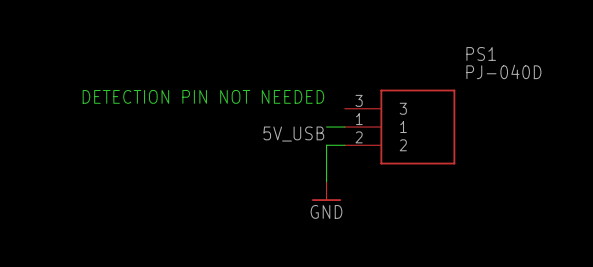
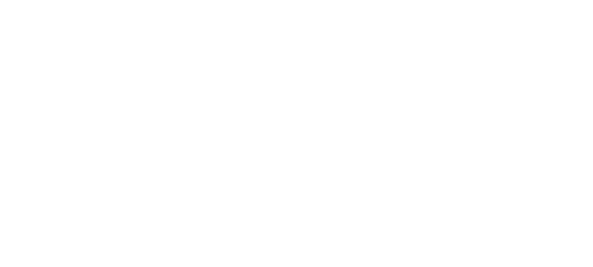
text: DETECTION PIN NOT NEEDED (203, 96) -> none
wire: (326, 127) (344, 127) -> none
PS1: PJ-040D (400, 127) -> none
label: 5V_USB (293, 134) -> none
wire: (344, 145) (326, 145) (326, 181) -> none
power symbol: GND (326, 191) -> none

